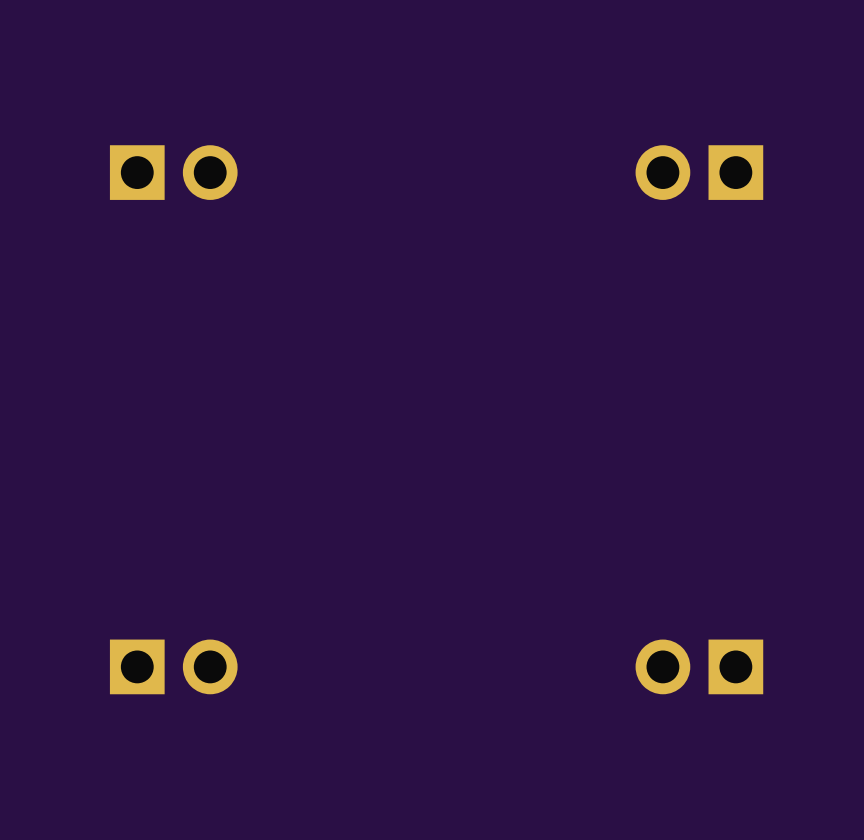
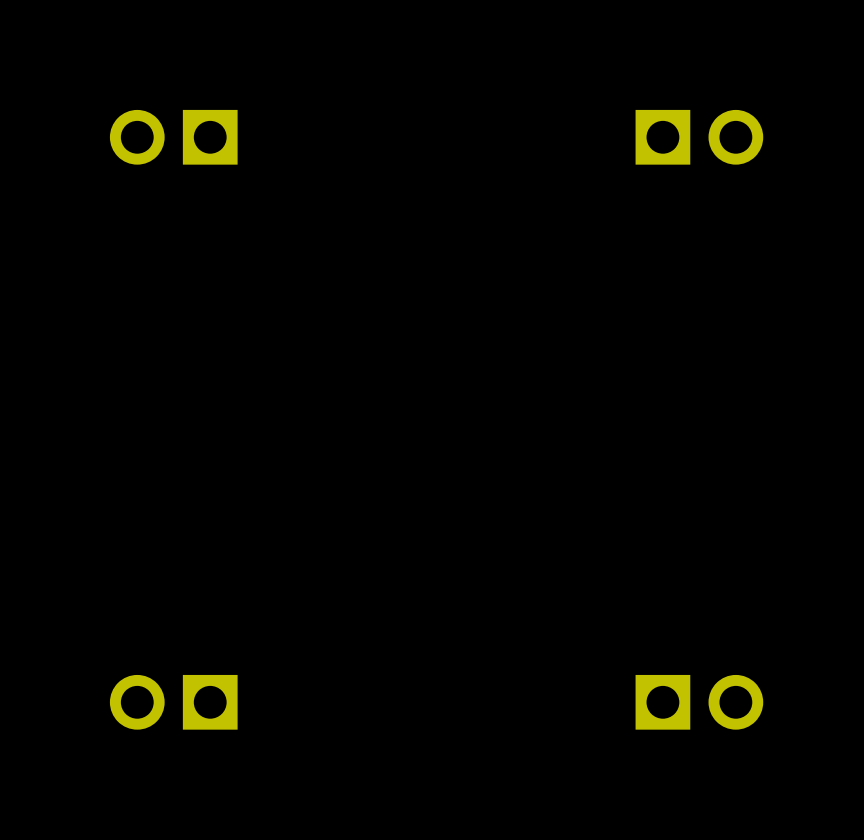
part rotation: 0° (173, 172) -> 180° (173, 137)
part rotation: 0° (699, 172) -> 180° (699, 137)
part rotation: 0° (173, 666) -> 180° (173, 702)
part rotation: 0° (699, 666) -> 180° (699, 702)

